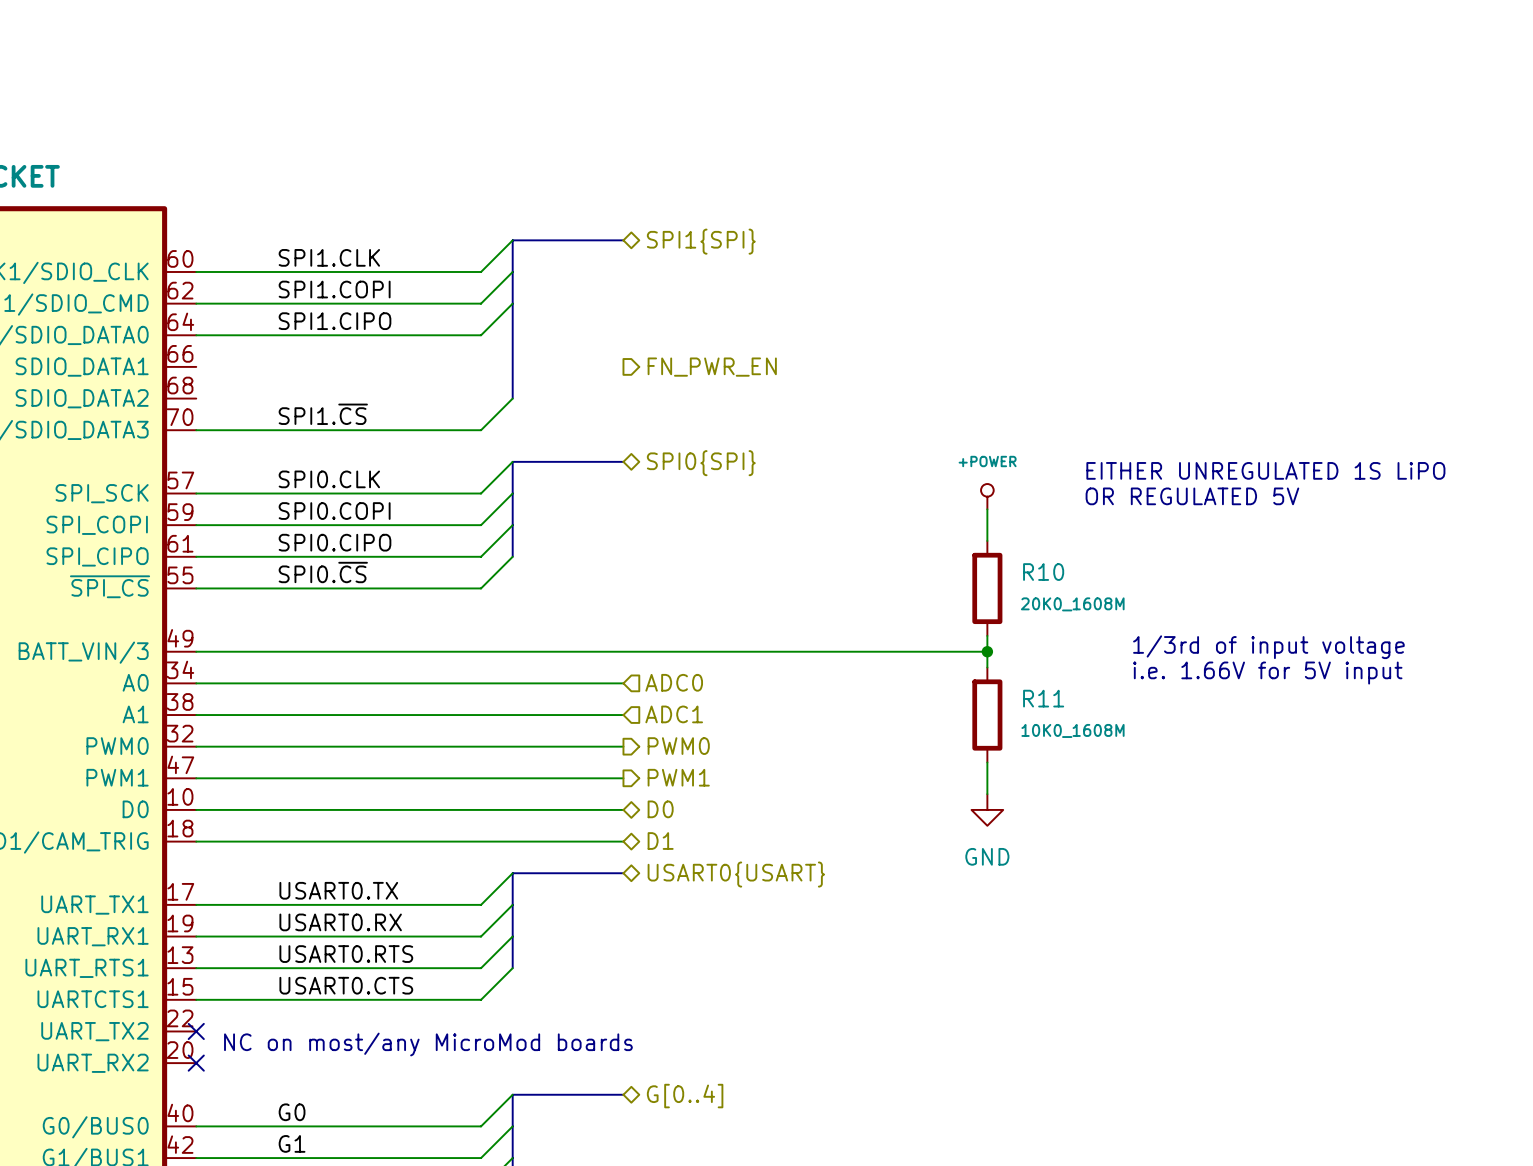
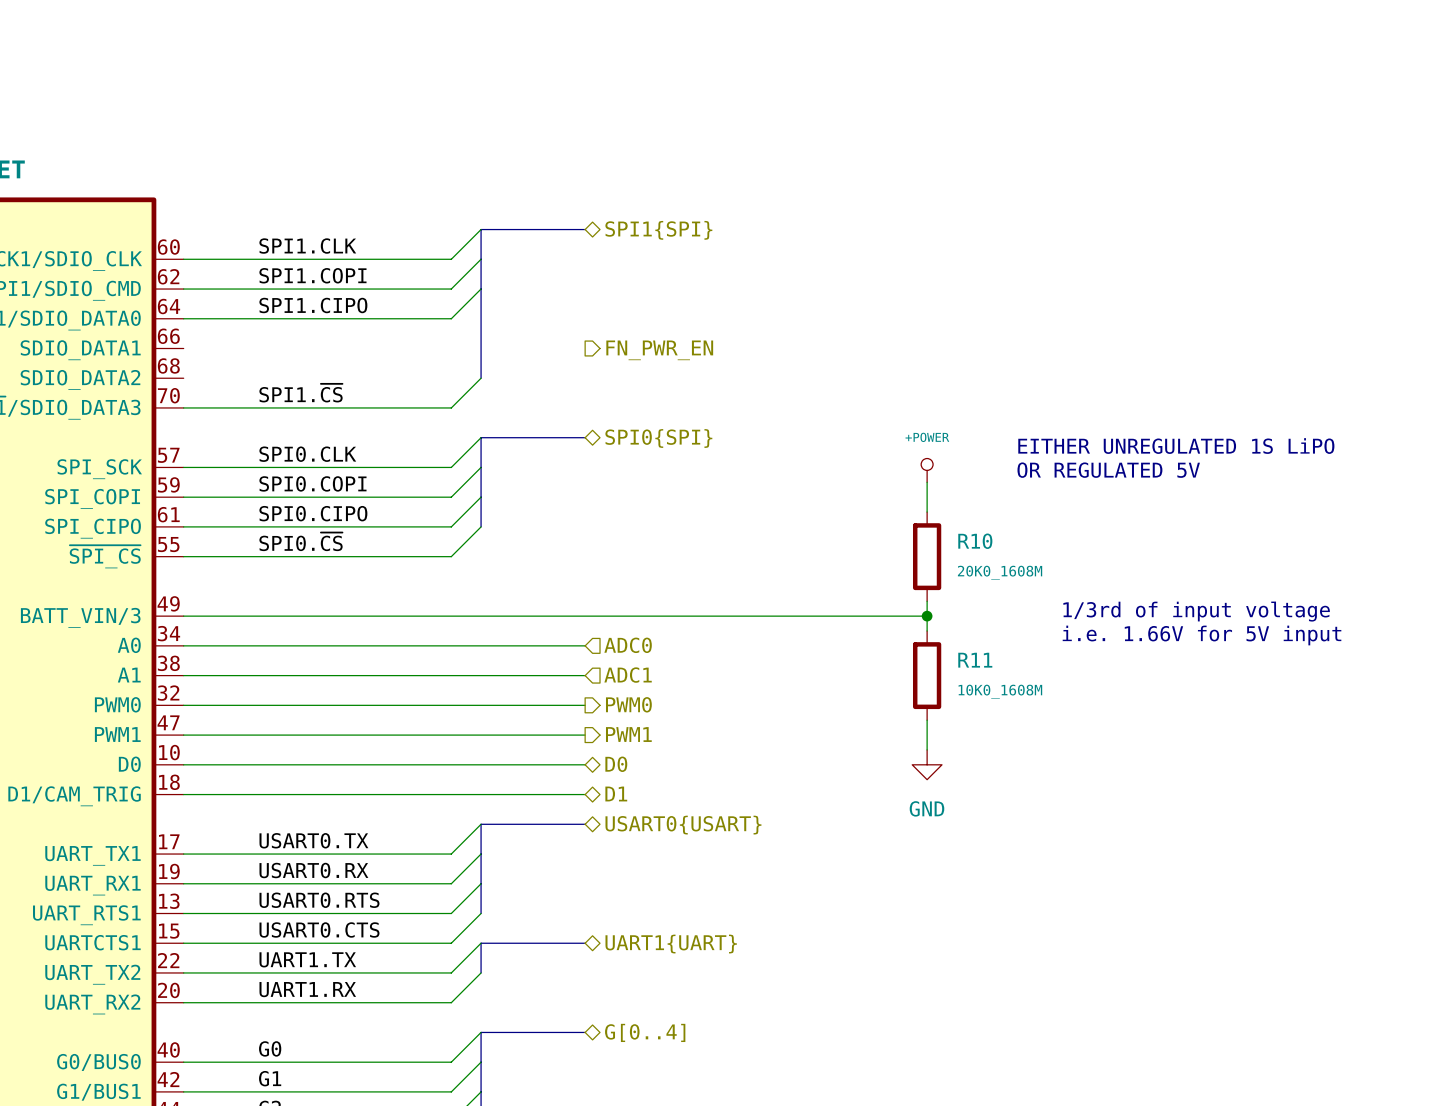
wire: none -> (481, 943) (451, 972) (183, 972)
bus: none -> (585, 943) (481, 943) (481, 972)
hierarchical label: none -> UART1{UART} (671, 944)
label: none -> UART1.TX (307, 959)
no-connect mark: (196, 1031) -> none
wire: none -> (481, 972) (451, 1002) (183, 1002)
text: NC on most/any MicroMod boards (428, 1044) -> none
label: none -> UART1.RX (307, 989)
no-connect mark: (196, 1063) -> none

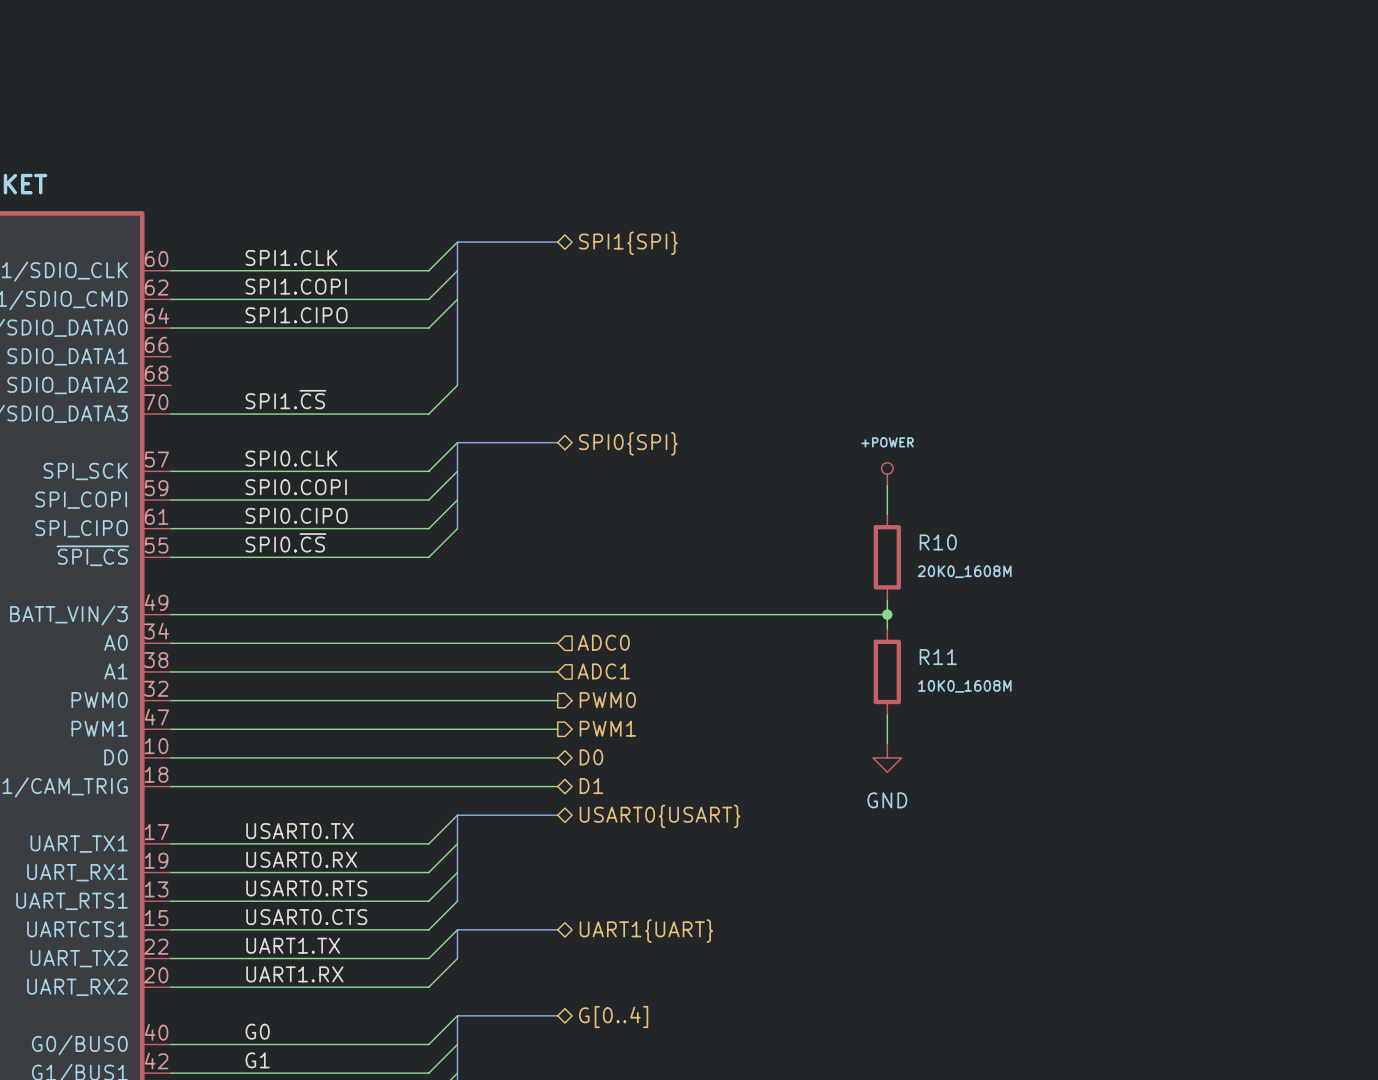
hierarchical label: FN_PWR_EN (659, 350) -> none
text: EITHER UNREGULATED 1S LiPO (1176, 446) -> none
text: OR REGULATED 5V (1108, 470) -> none
text: 1/3rd of input voltage (1196, 611) -> none
text: i.e. 1.66V for 5V input (1202, 635) -> none

